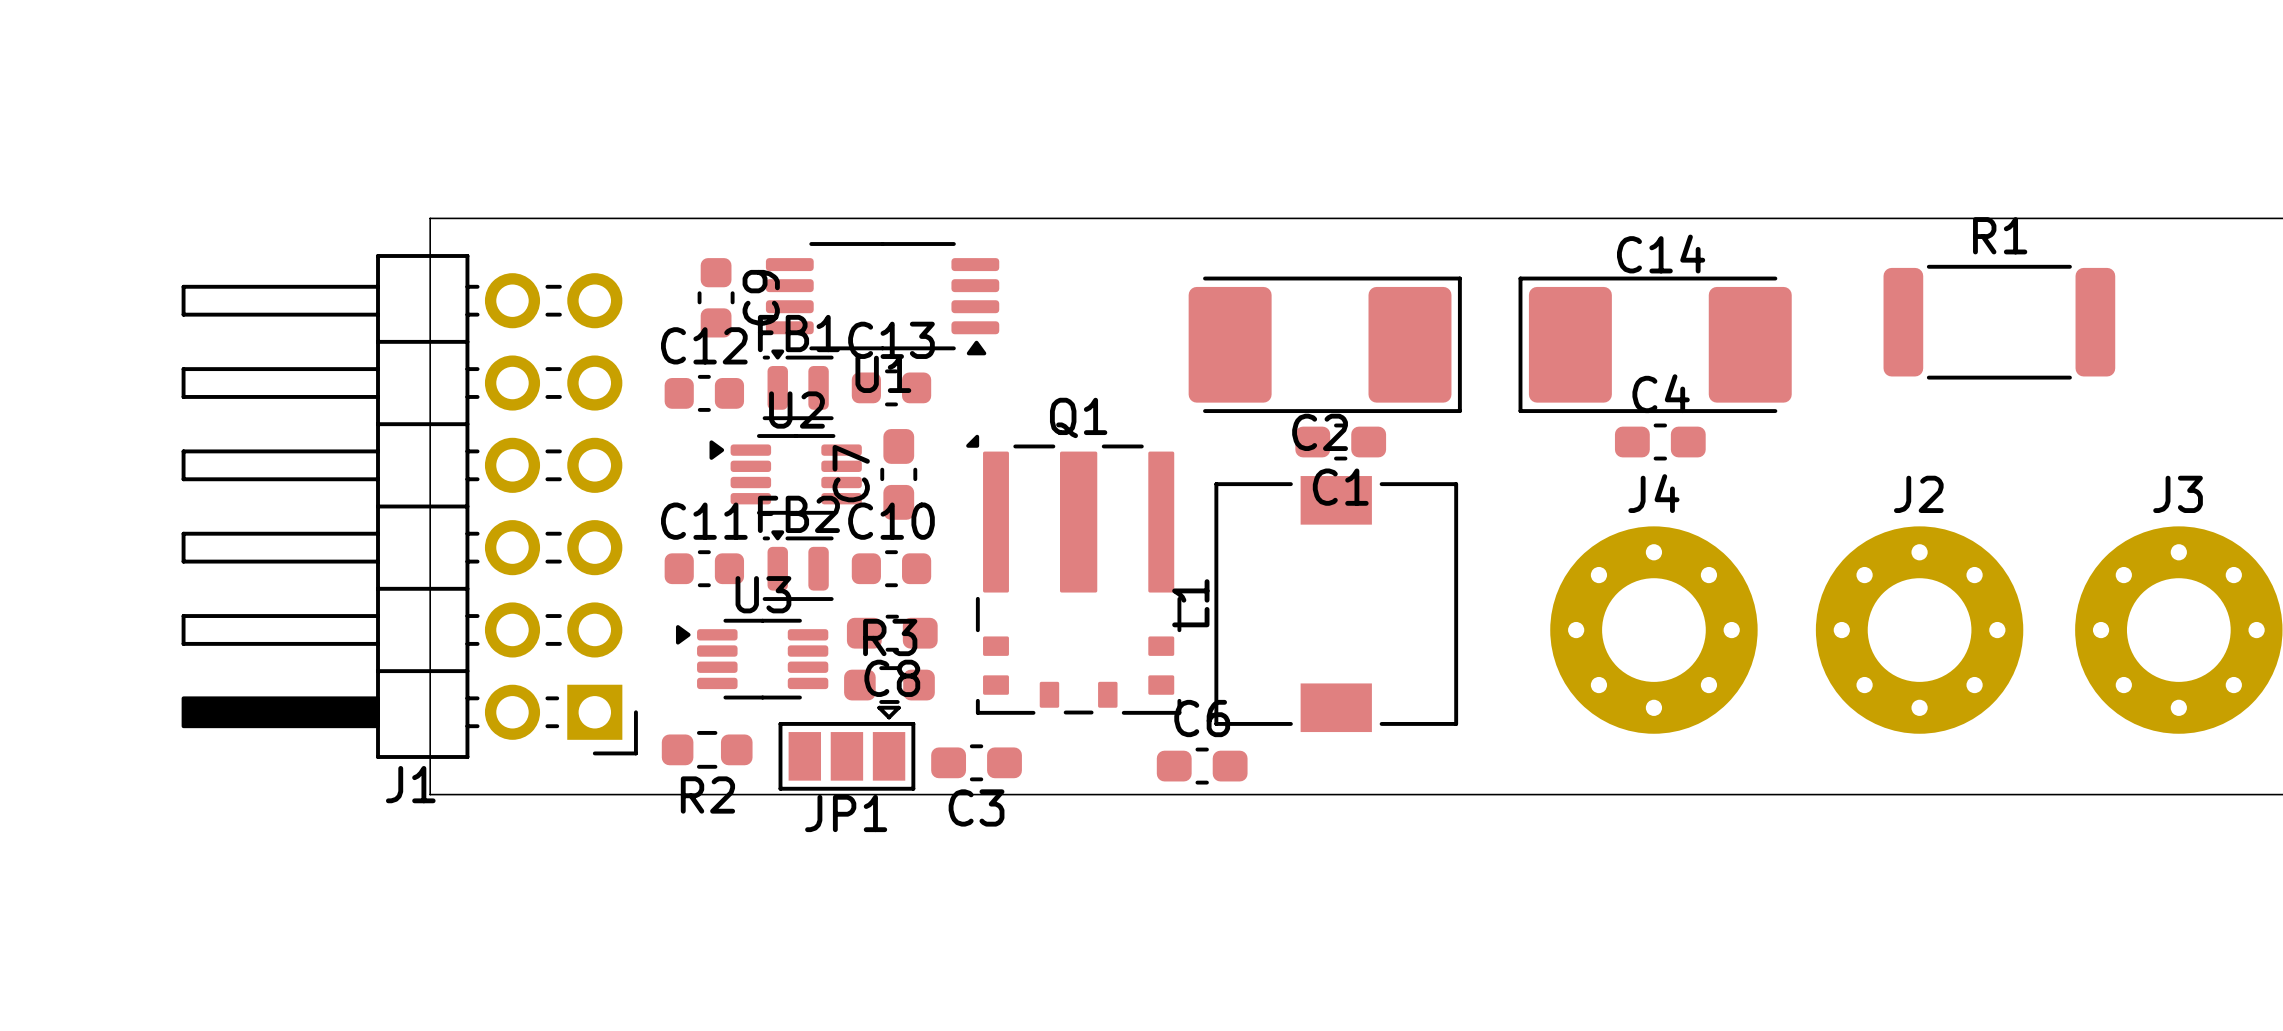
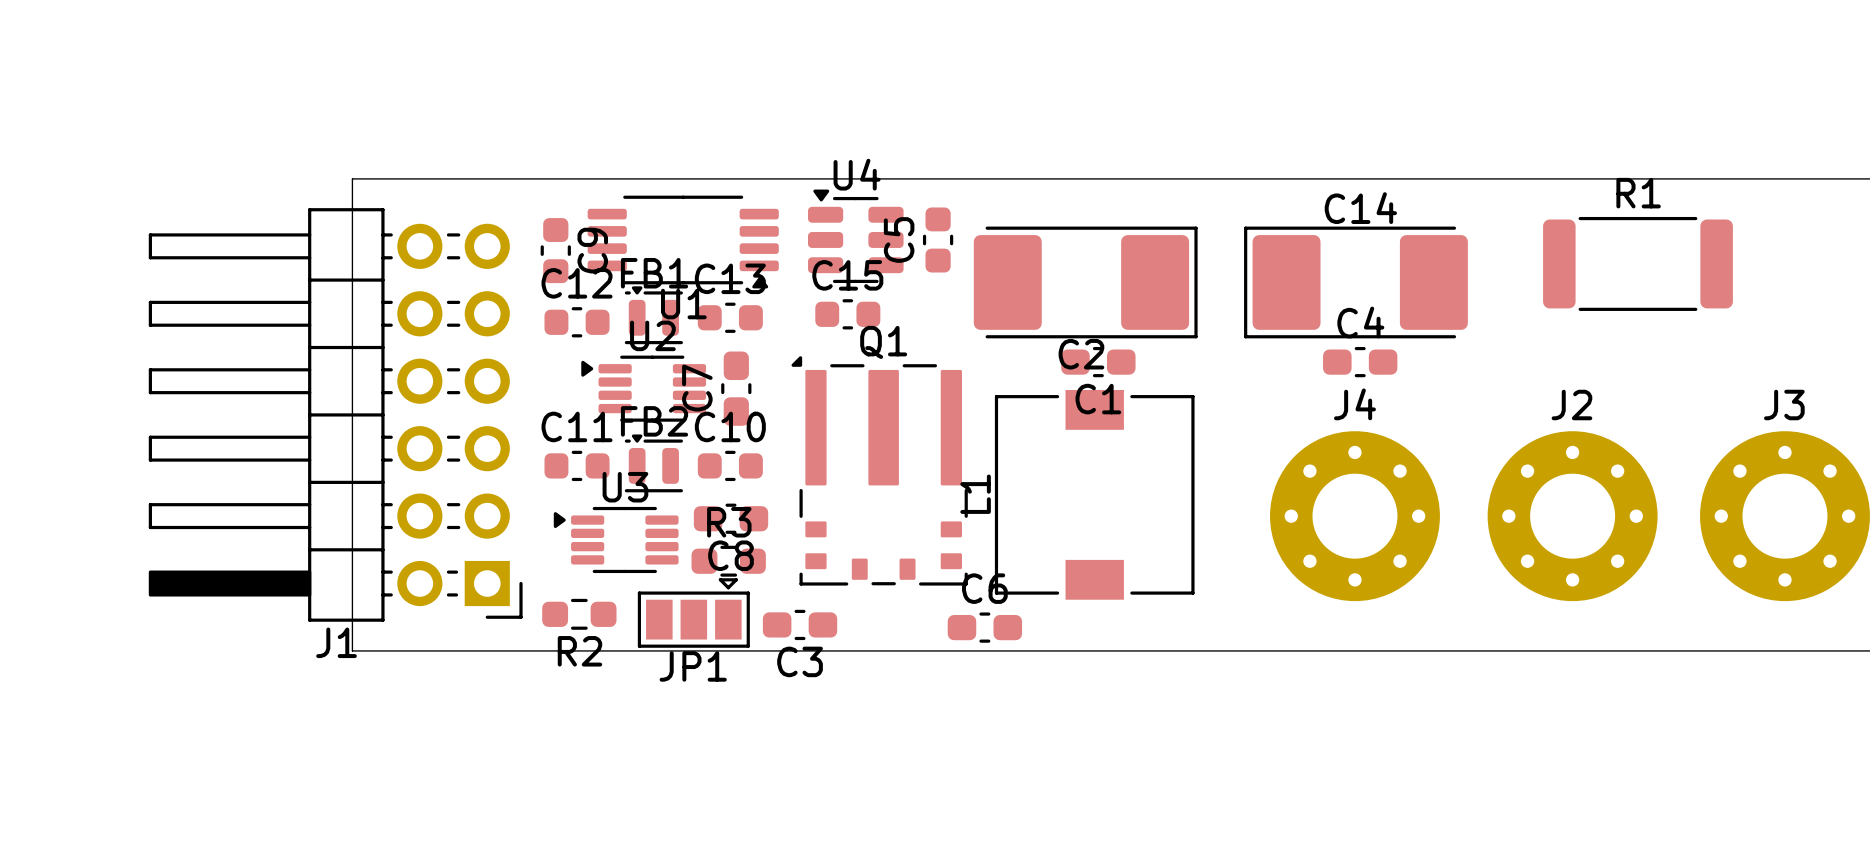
U4: none -> (855, 236)
C5: none -> (938, 239)
C9 position: (716, 297) -> (555, 250)
U1 position: (882, 298) -> (683, 242)
C15: none -> (847, 314)

